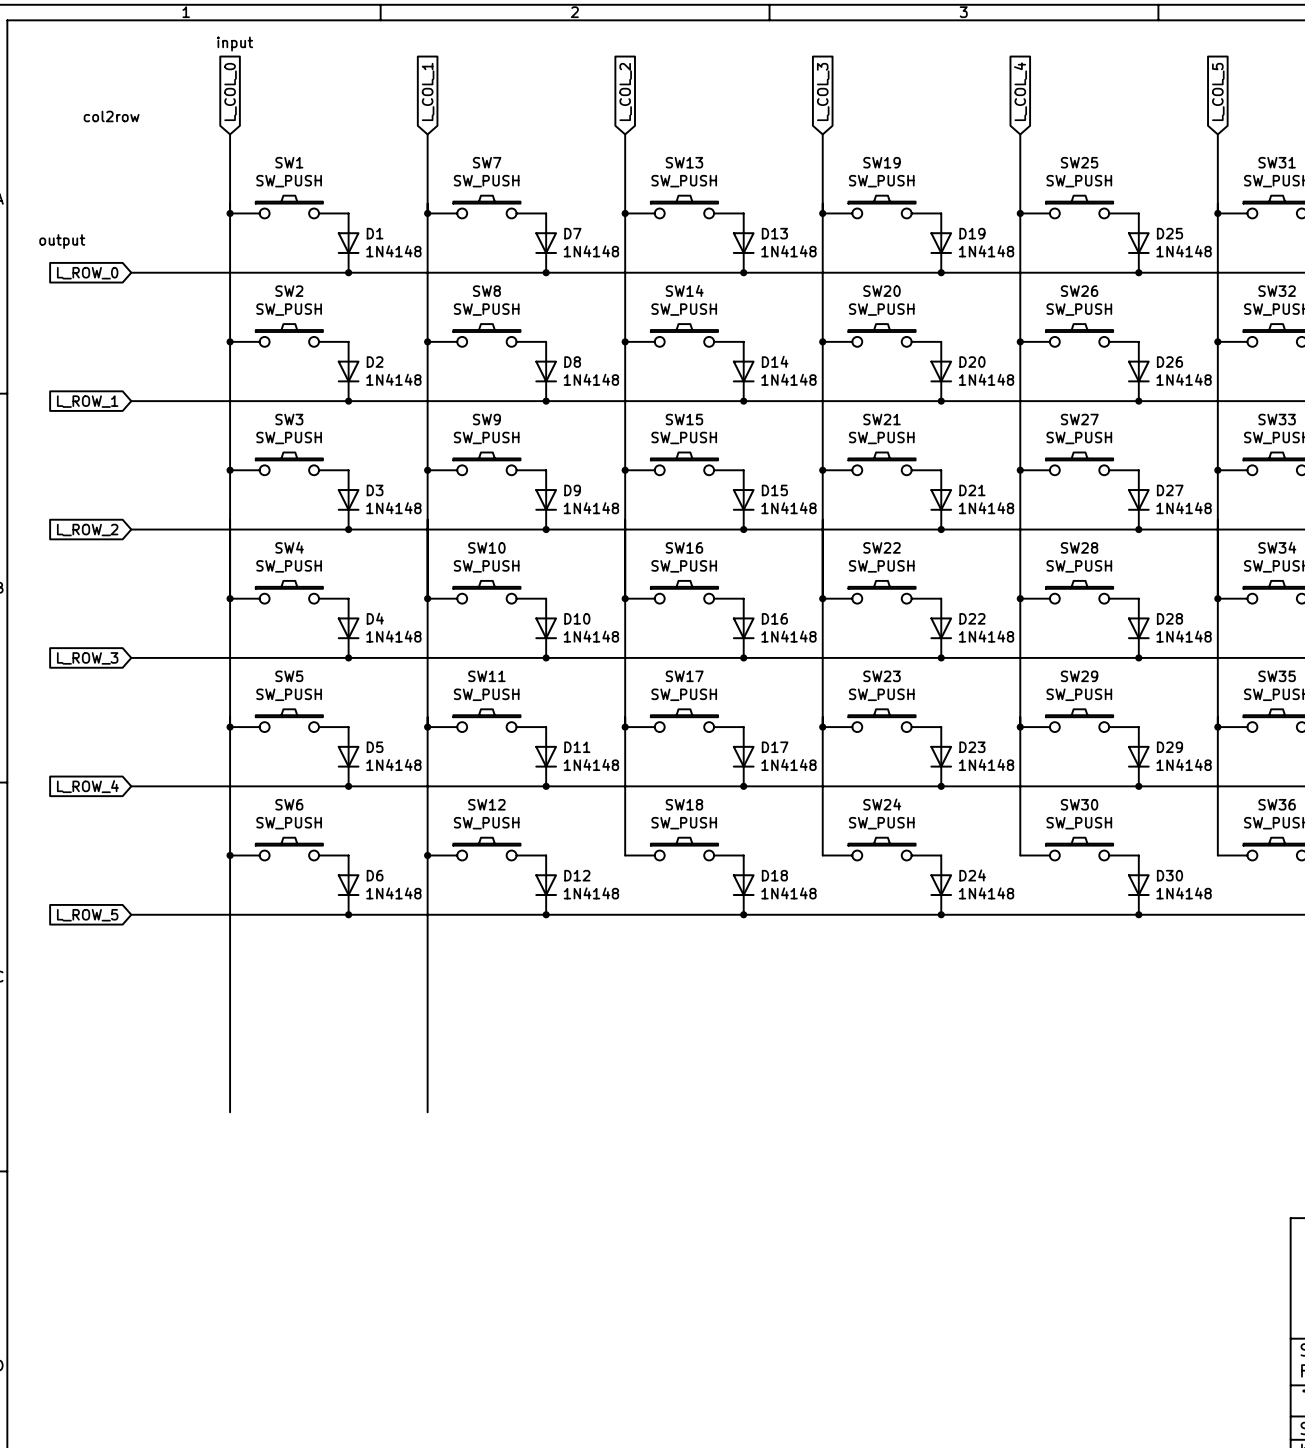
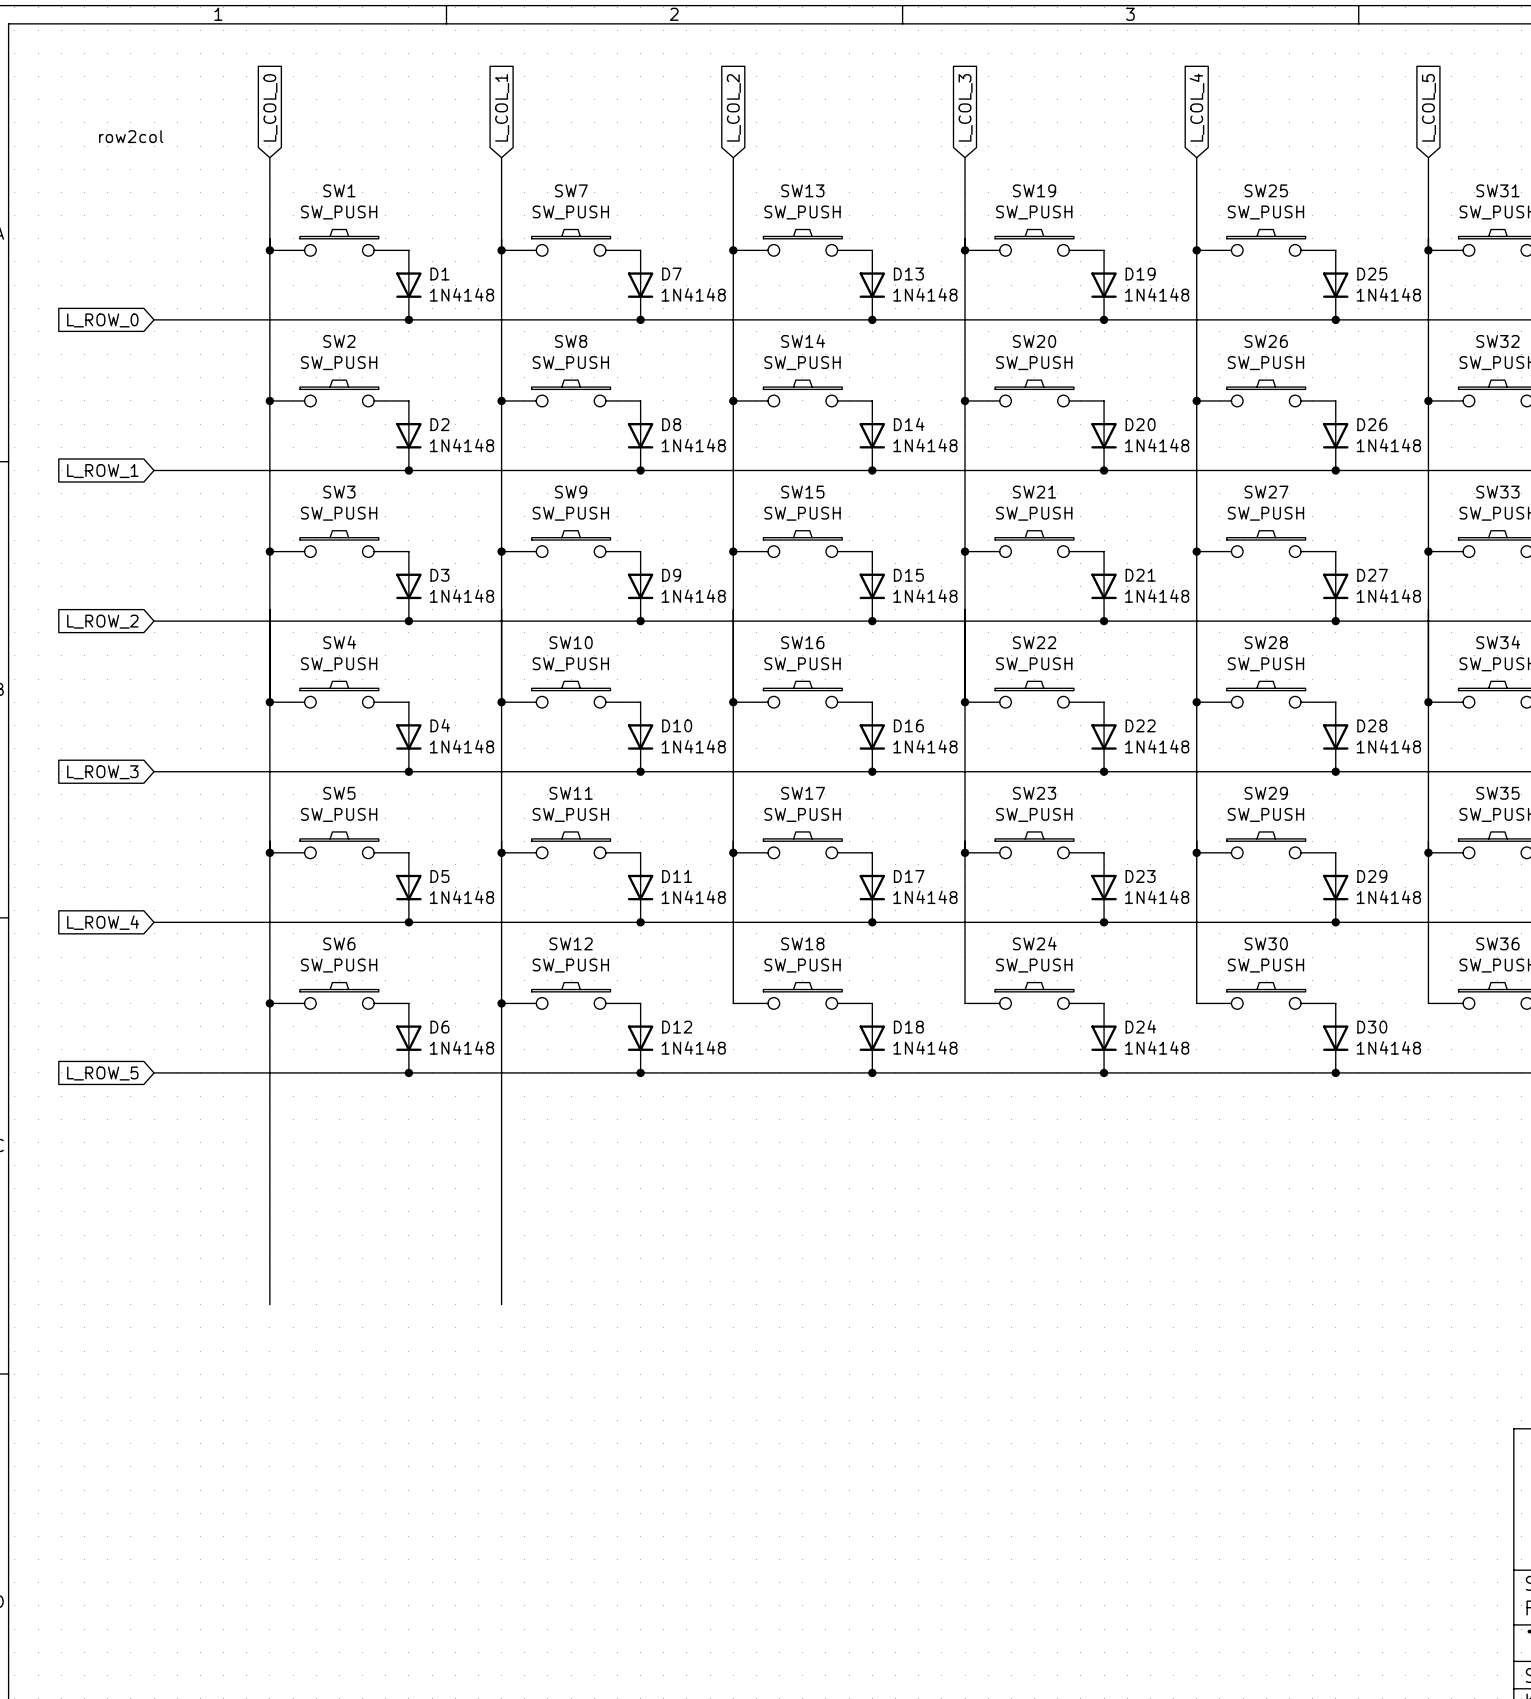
text: input (235, 44) -> none
text: col2row (111, 116) -> row2col (131, 136)
text: output (62, 241) -> none

